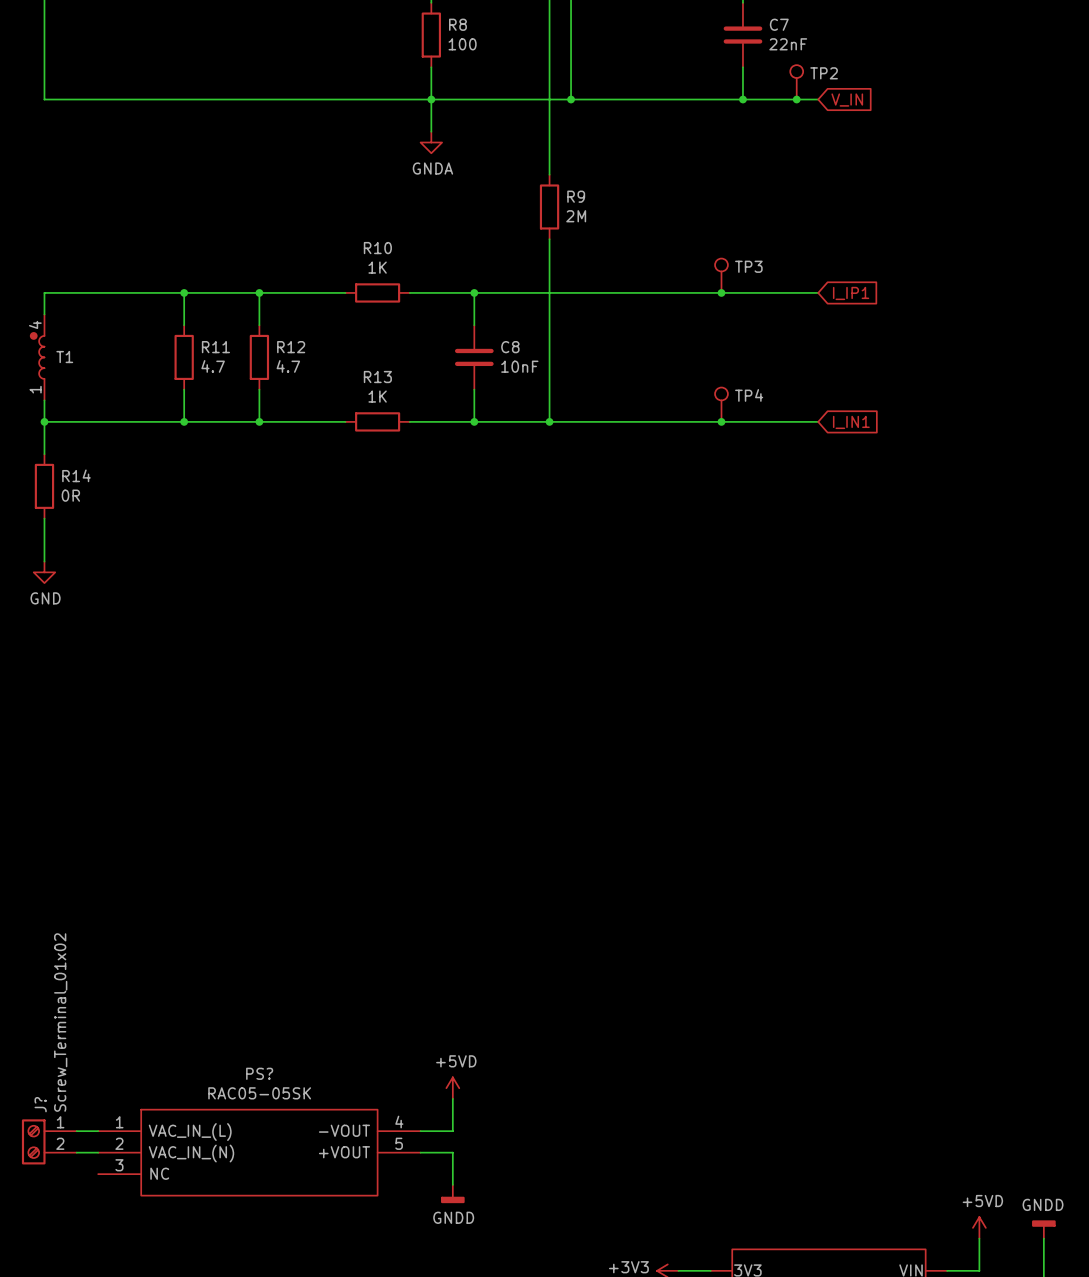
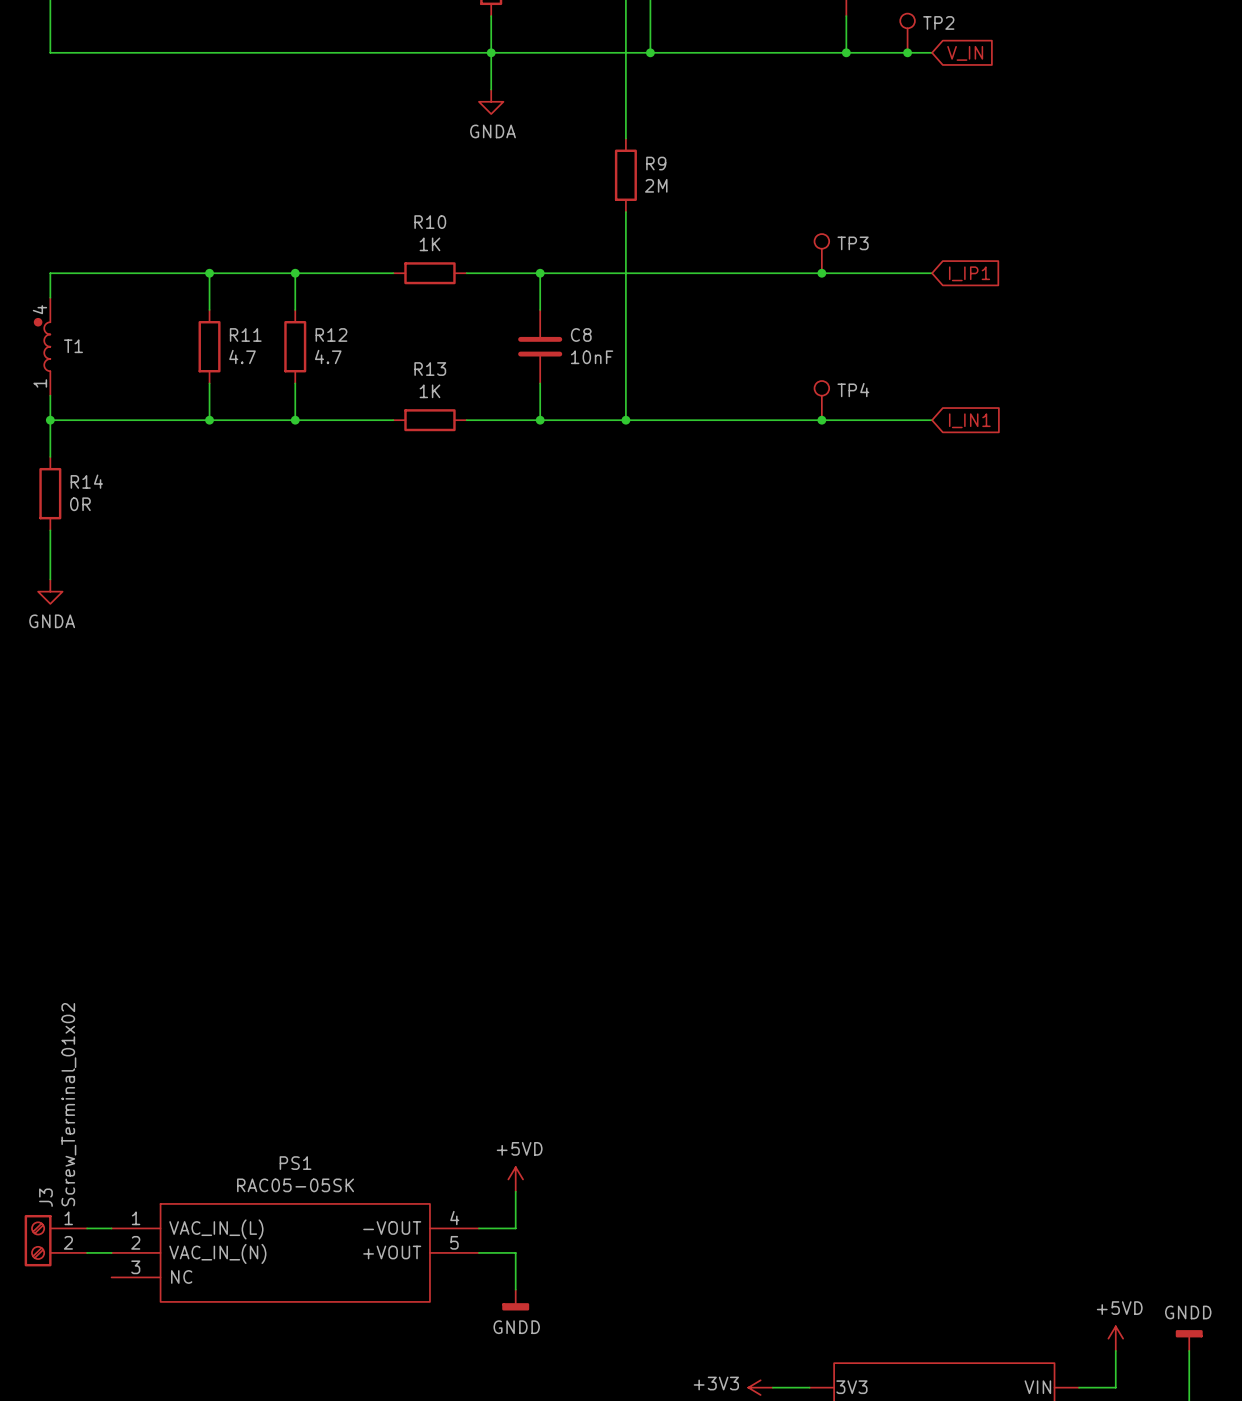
power symbol: GND (44, 572) -> GNDA (50, 591)
PS? name: PS? (259, 1073) -> PS1 (295, 1163)
J? name: J? (40, 1104) -> J3 (45, 1197)

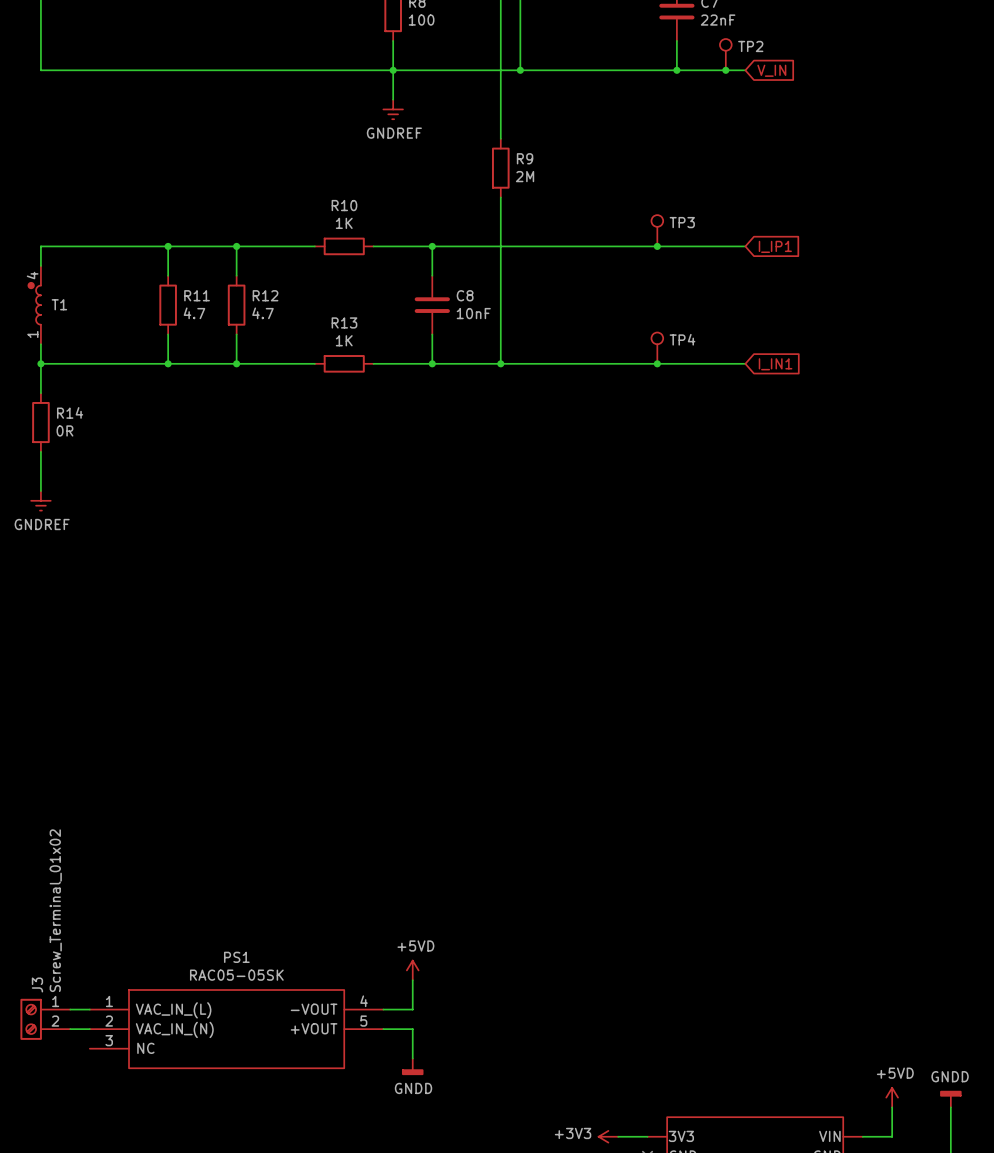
power symbol: GNDA (491, 101) -> GNDREF (393, 109)
power symbol: GNDA (50, 591) -> GNDREF (40, 500)

